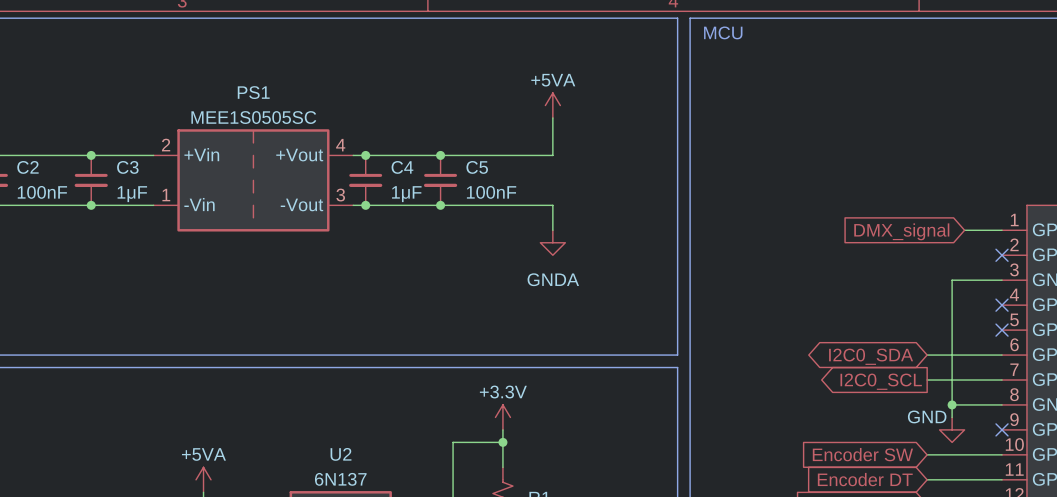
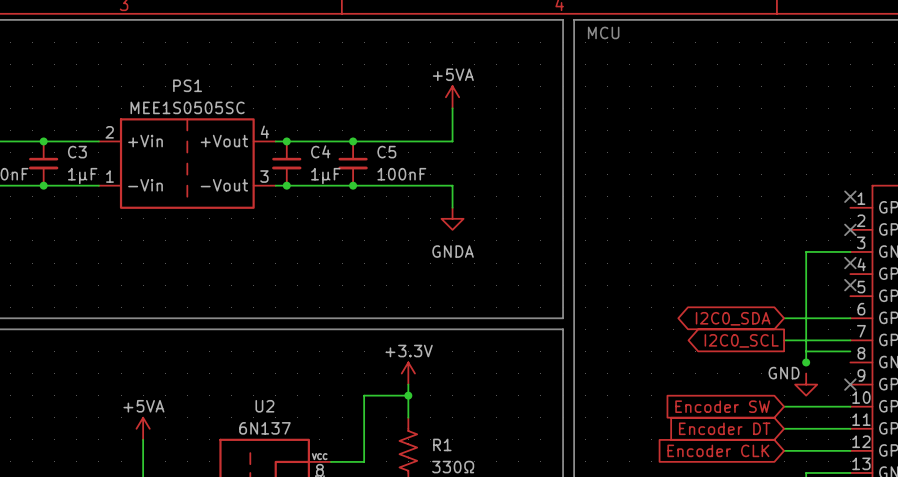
no-connect mark: none -> (850, 196)
wire: (964, 230) (1002, 230) -> none
global label: DMX_signal (901, 231) -> none
no-connect mark: none -> (850, 263)
no-connect mark: (1002, 305) -> none
no-connect mark: none -> (850, 285)
no-connect mark: (1002, 330) -> none
wire: none -> (806, 351) (850, 351)
wire: (1002, 404) (952, 404) (952, 417) -> none

